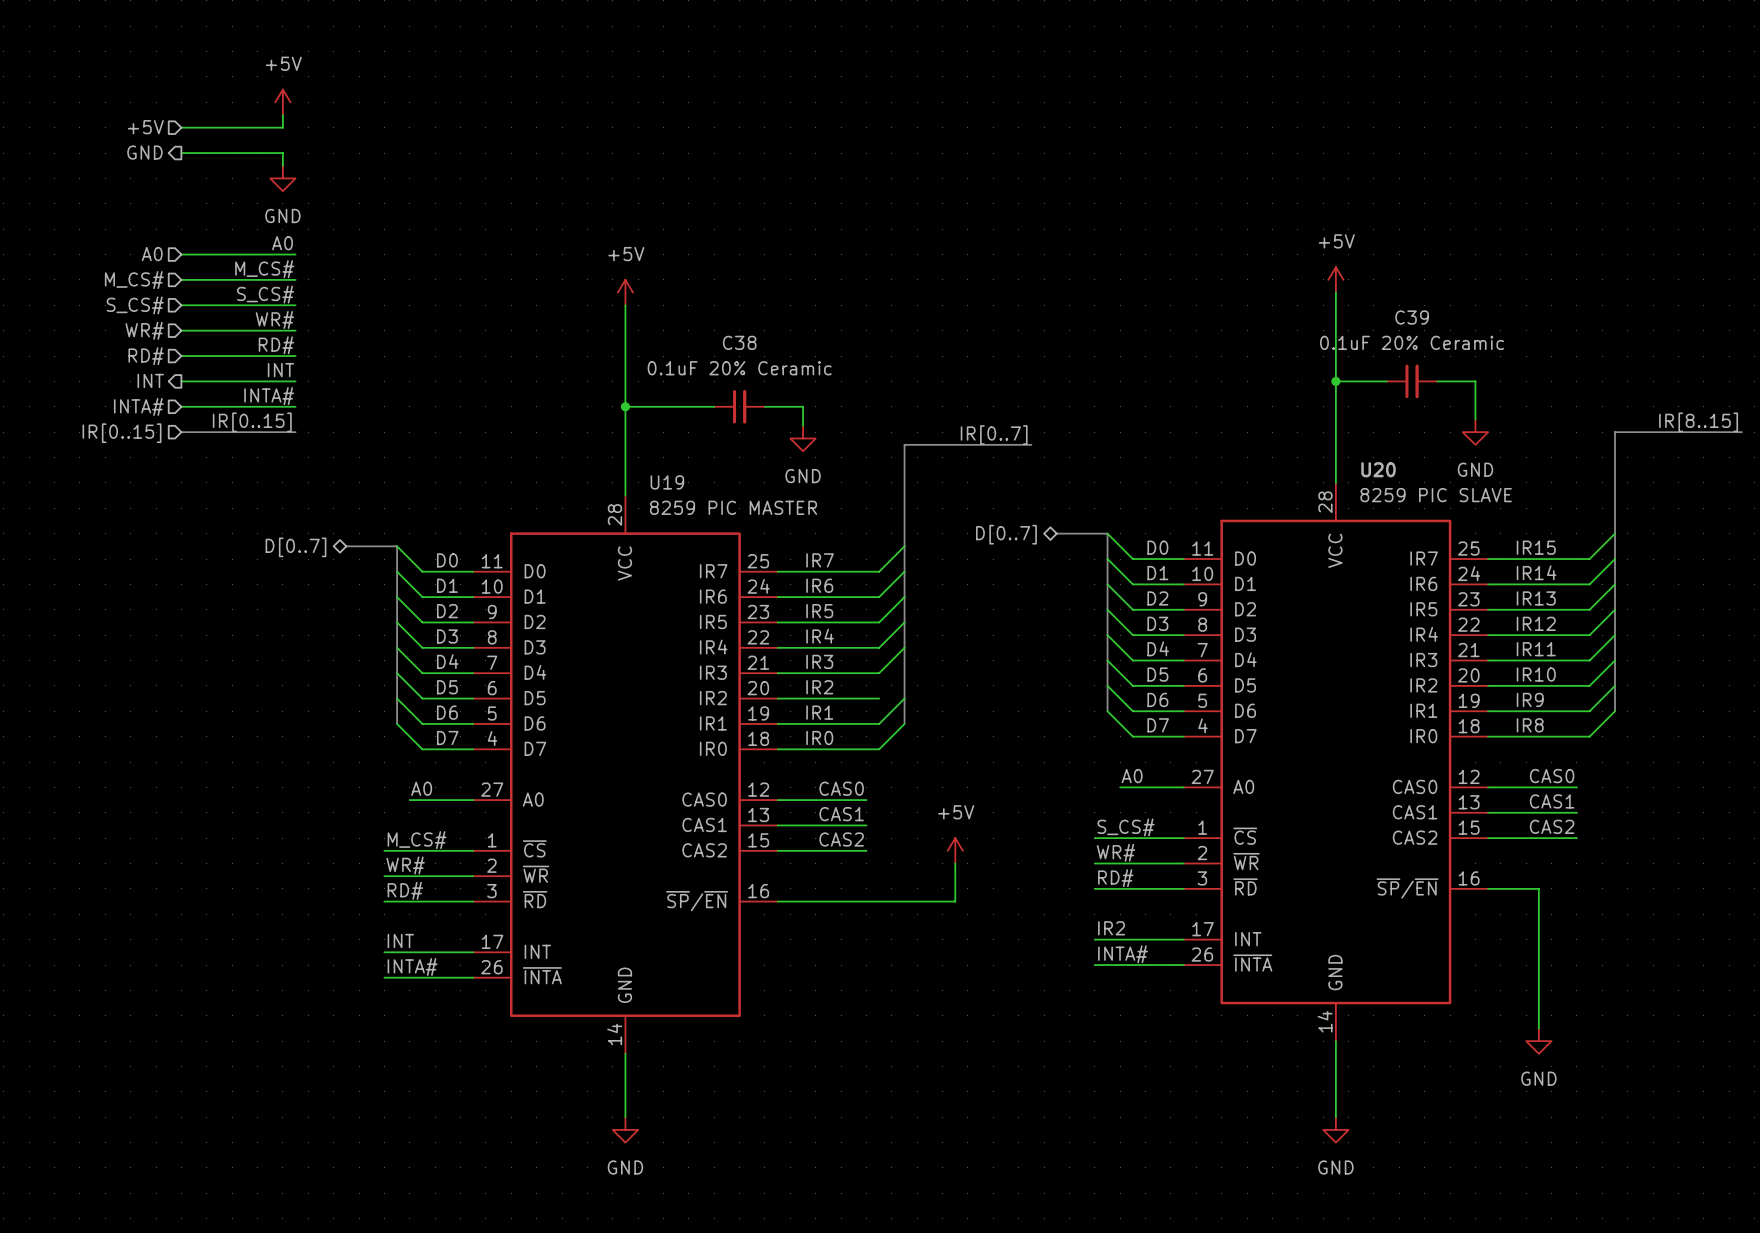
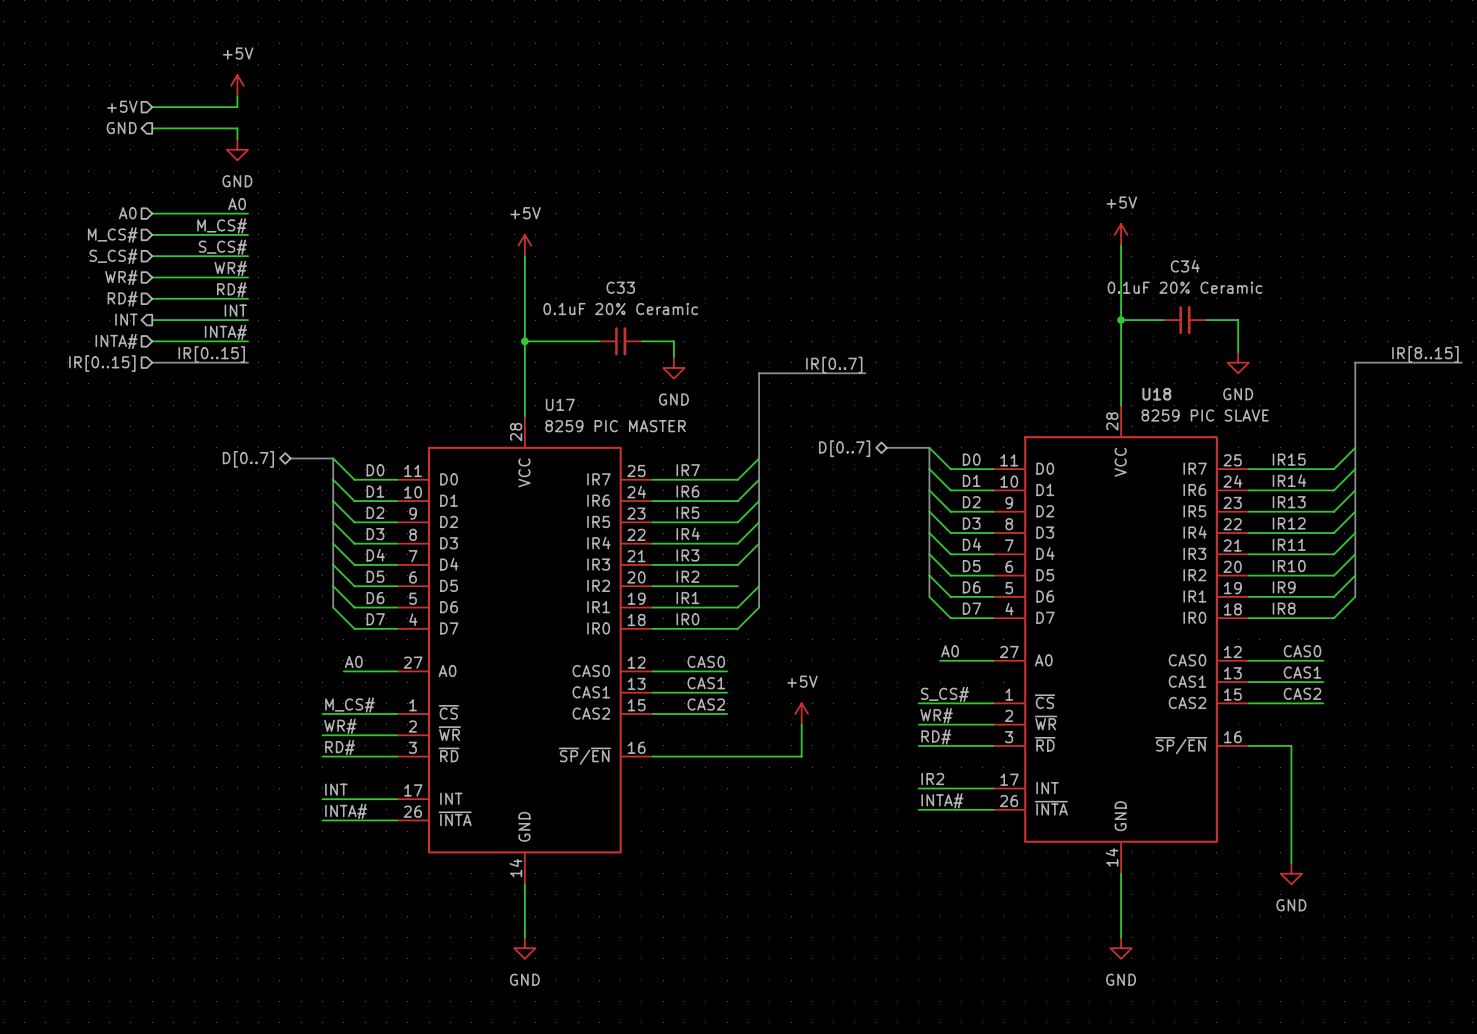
C39 name: C39 (1412, 317) -> C34 (1185, 266)
C38 name: C38 (739, 342) -> C33 (620, 287)
U20 name: U20 (1378, 469) -> U18 (1156, 394)
U19 name: U19 (667, 482) -> U17 (560, 404)

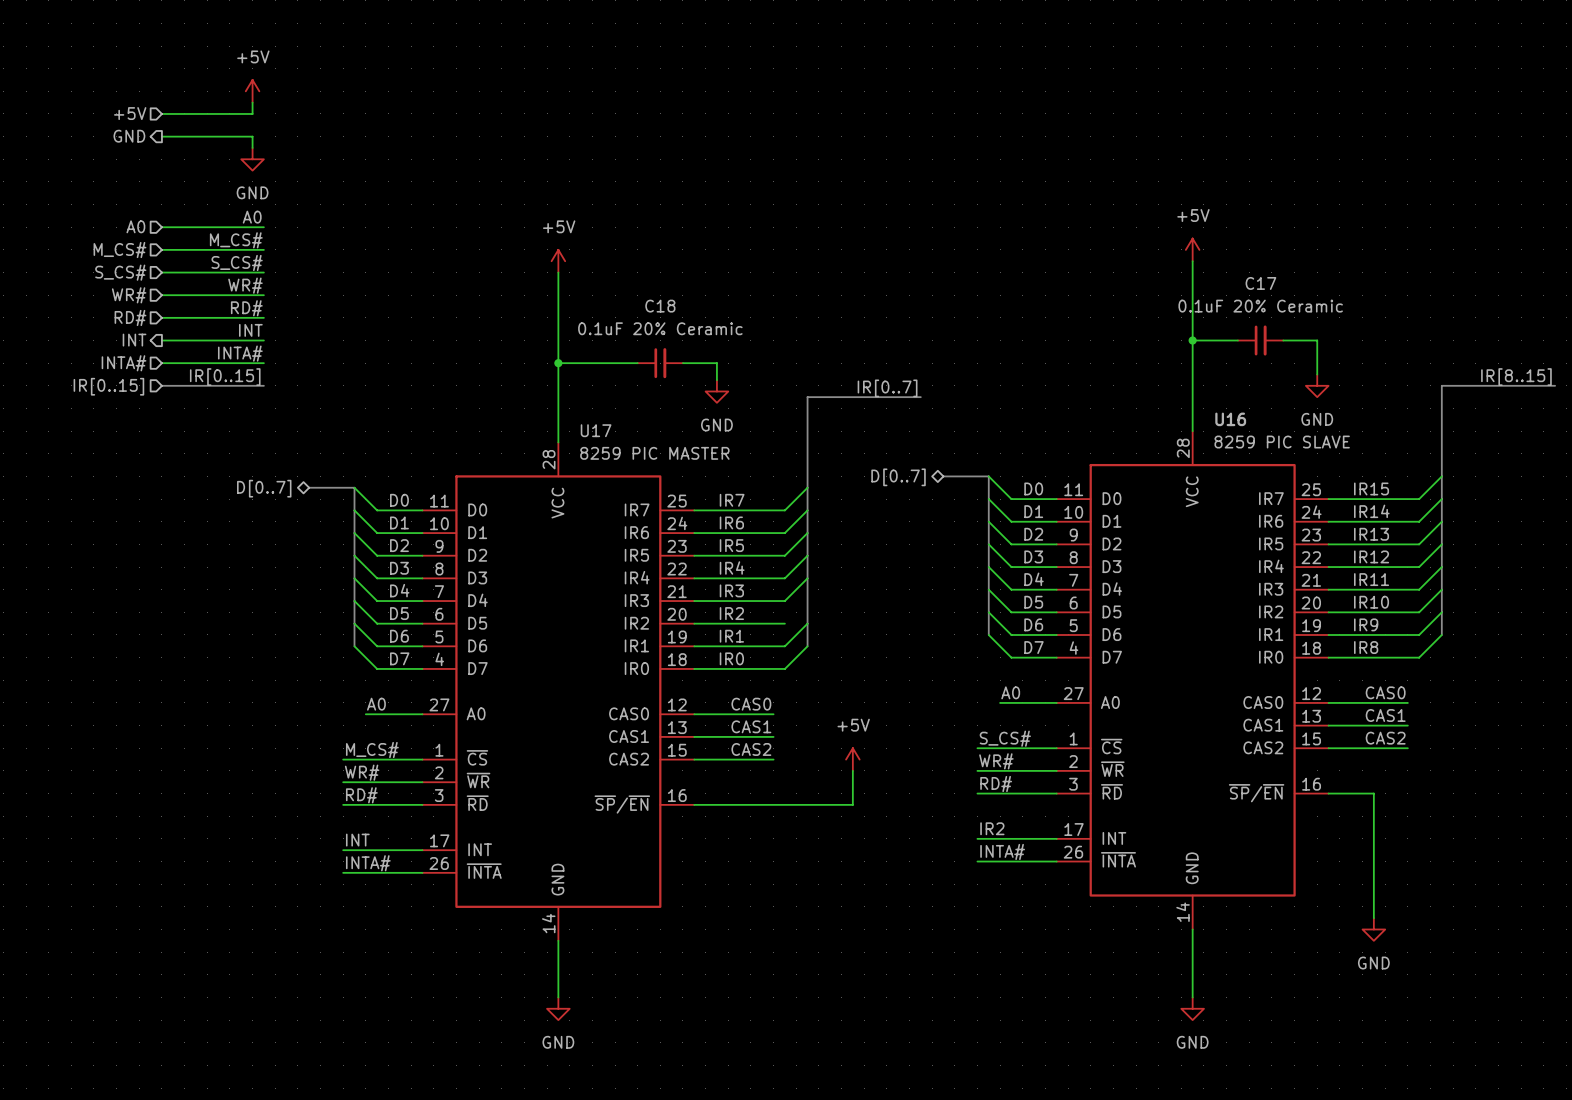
C34 name: C34 (1185, 266) -> C17 (1260, 283)
C33 name: C33 (620, 287) -> C18 (660, 306)
U18 name: U18 (1156, 394) -> U16 (1230, 419)

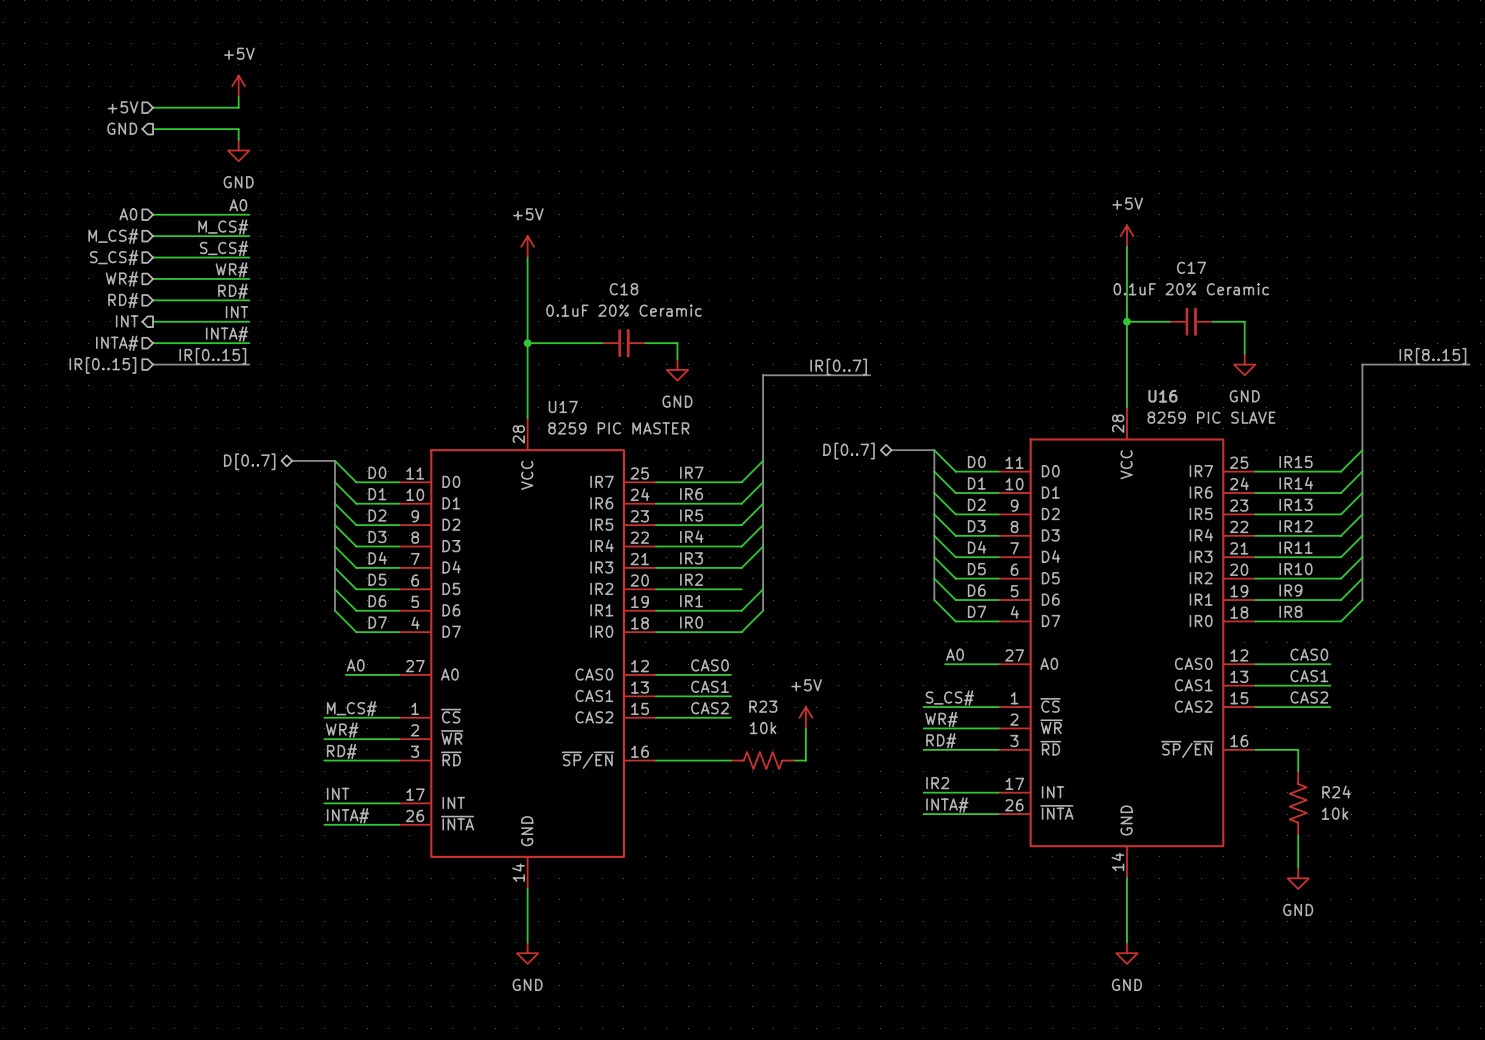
R23: none -> 10k (763, 760)
R24: none -> 10k (1298, 803)

